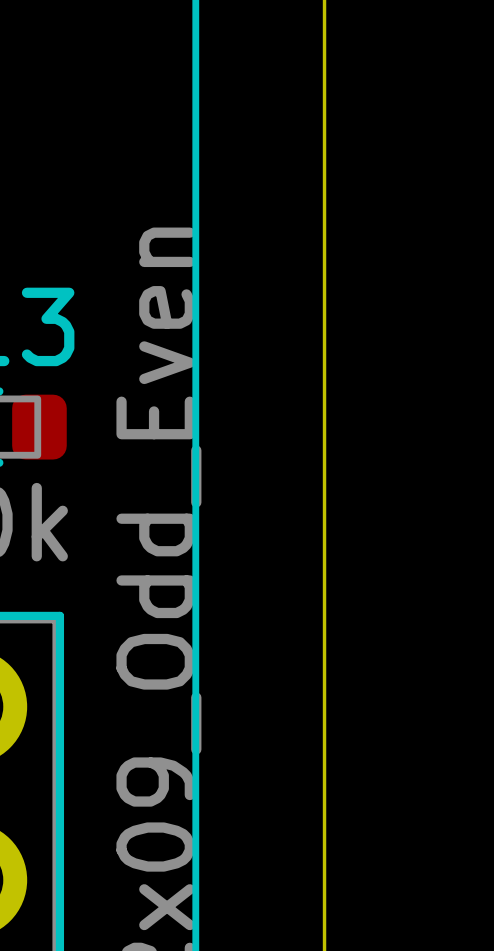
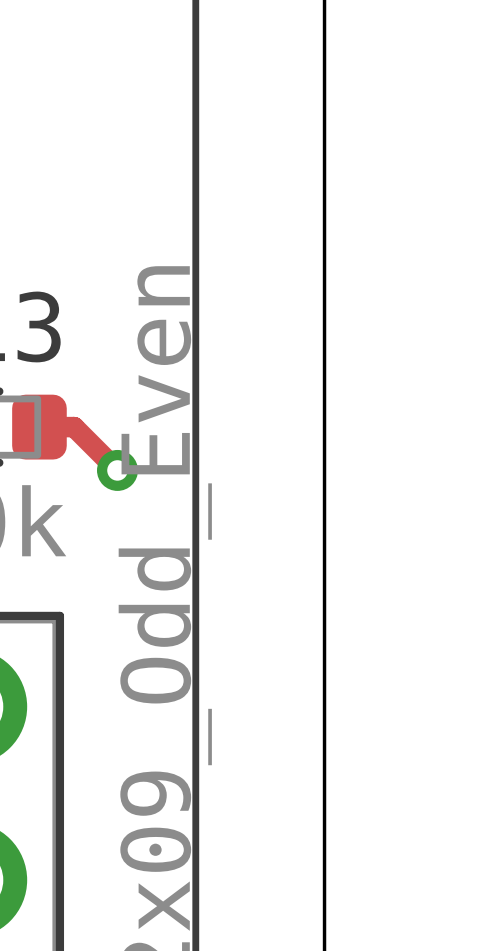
top track: none -> (39, 427) (74, 427) (117, 470)
via: none -> (117, 470)

